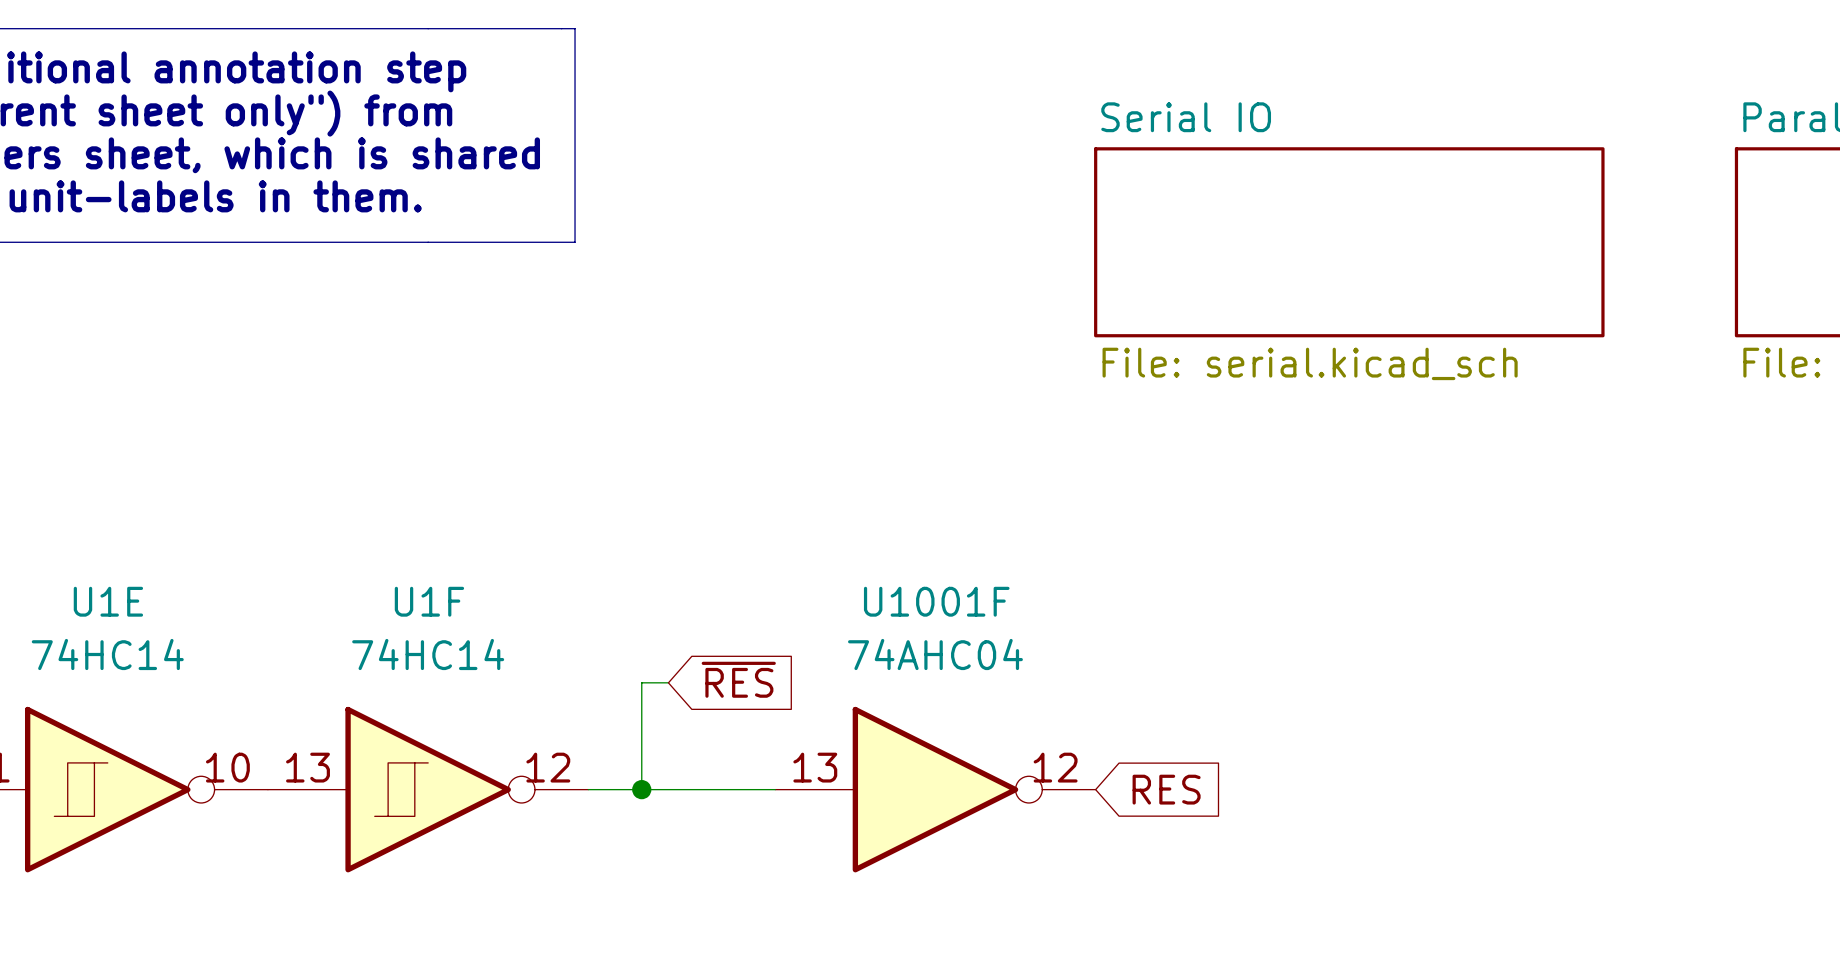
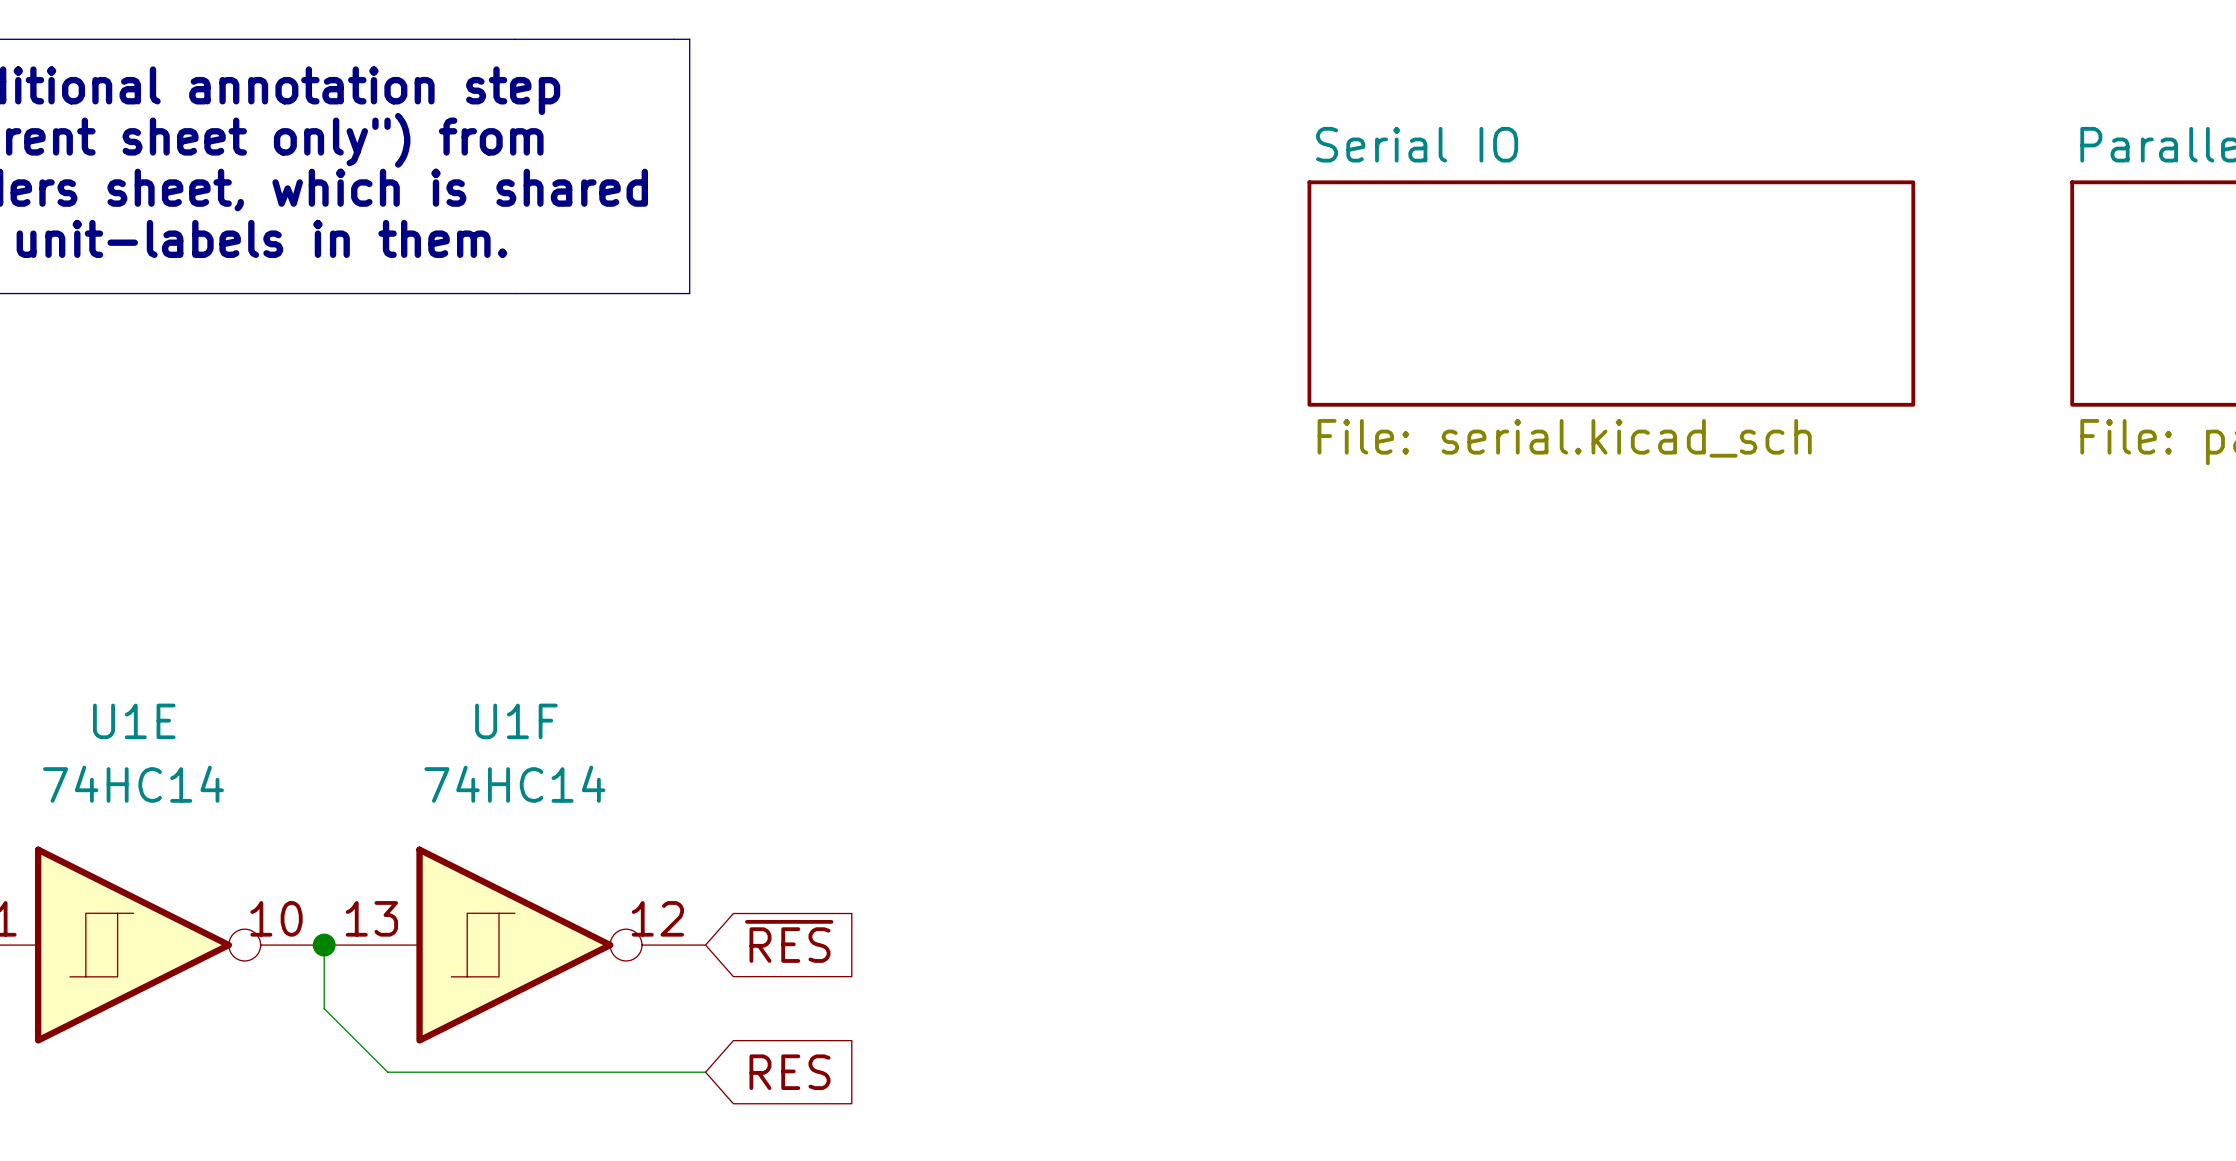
global label position: ~{RES} (738, 679) -> ~{RES} (789, 941)
wire: (668, 682) (641, 682) (641, 789) -> none
wire: none -> (324, 945) (324, 1008) (387, 1072) (705, 1072)
junction: none -> (324, 945)
wire: (588, 789) (775, 789) -> none
junction: (641, 789) -> none
U1001F: 74AHC04 (935, 789) -> none
global label position: RES (1166, 789) -> RES (789, 1072)

